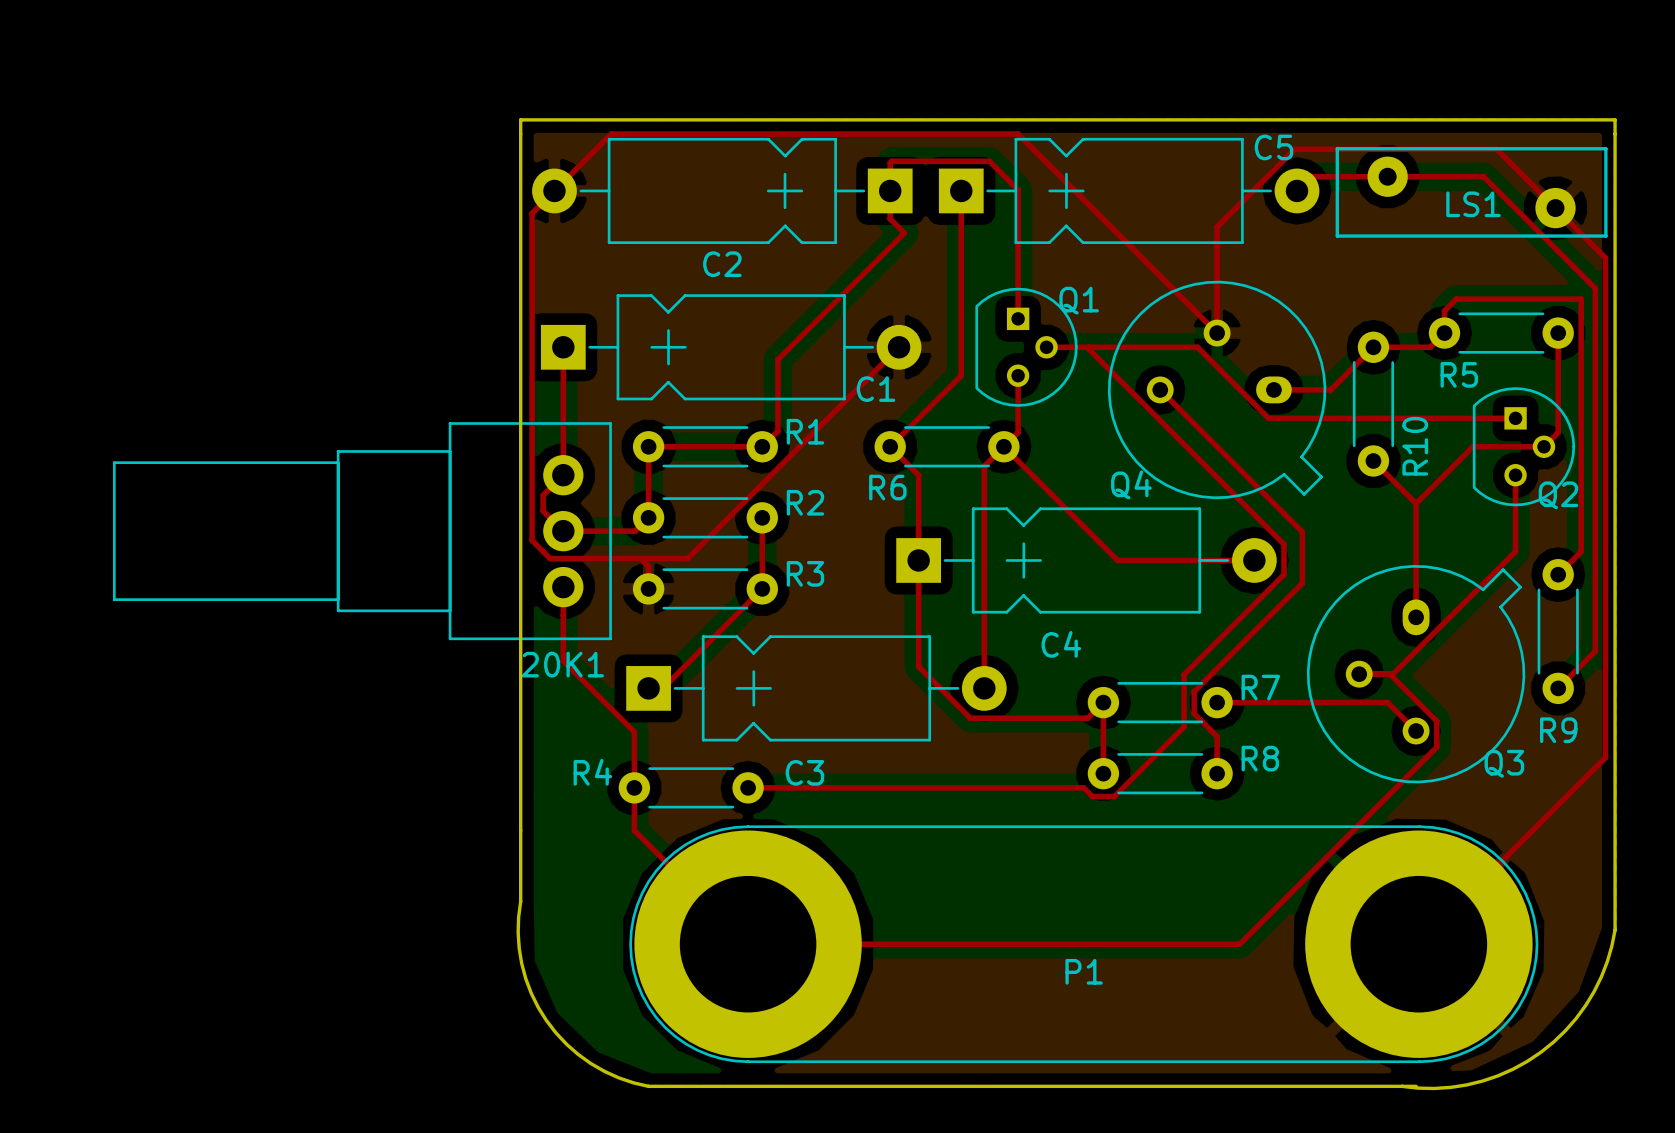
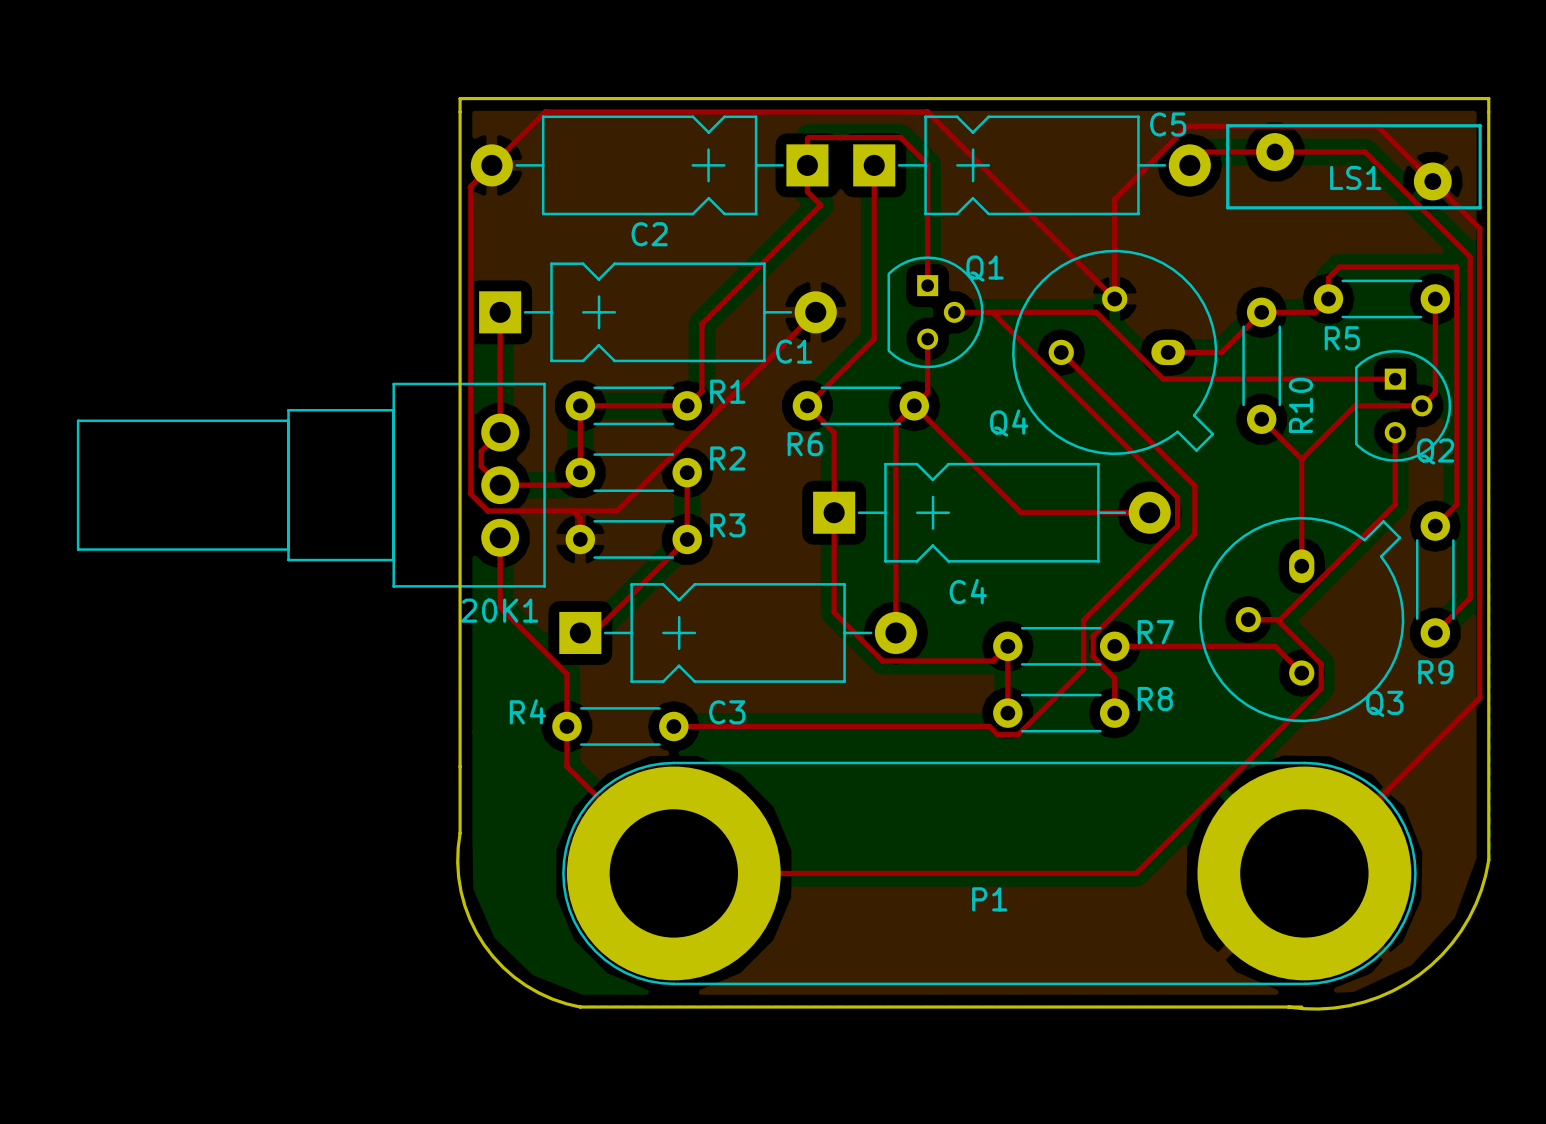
Q4 name position: Q4 (1131, 484) -> Q4 (1009, 423)

